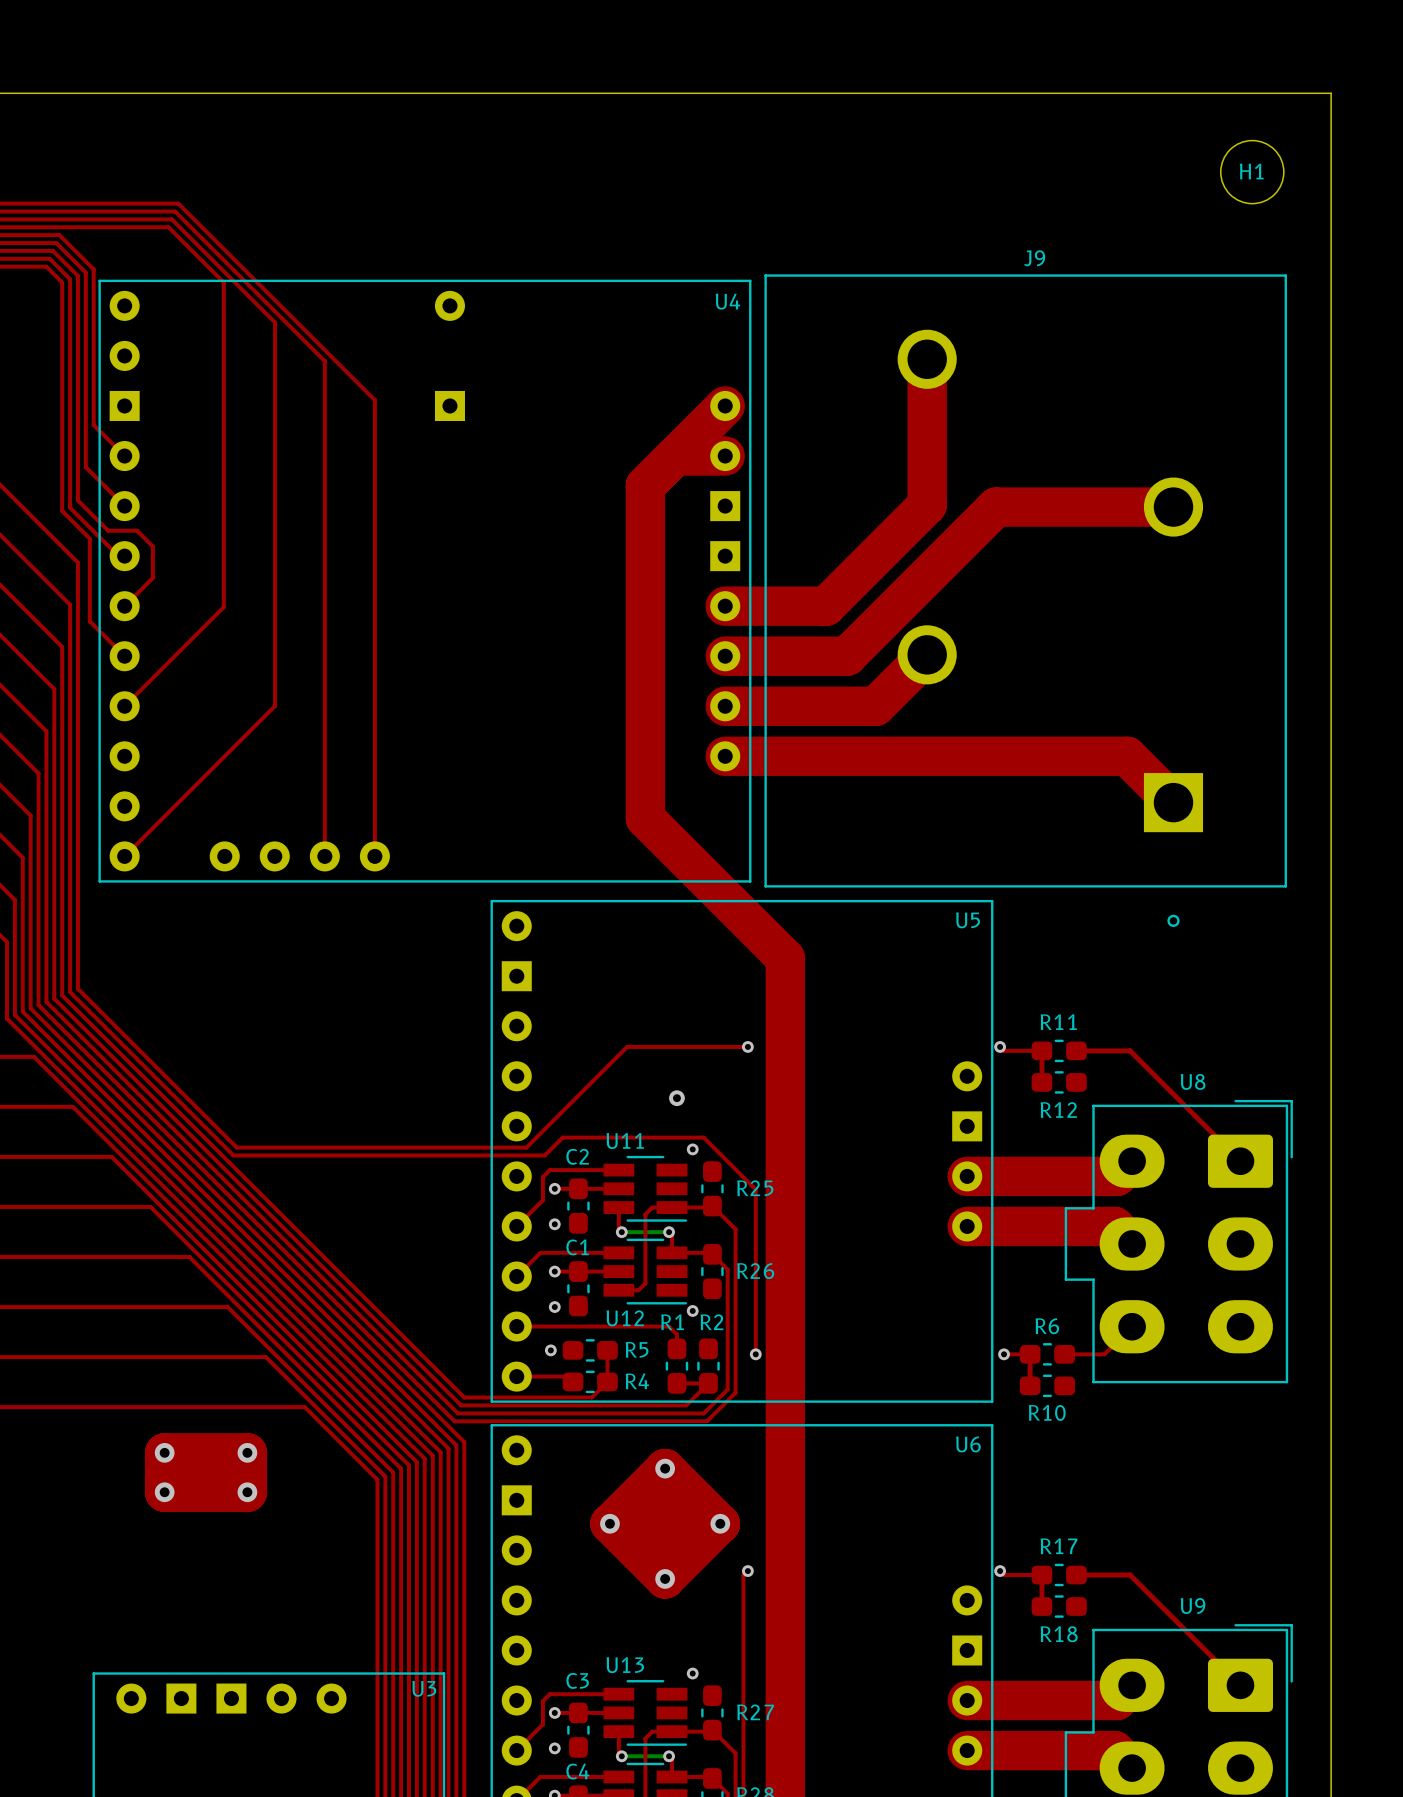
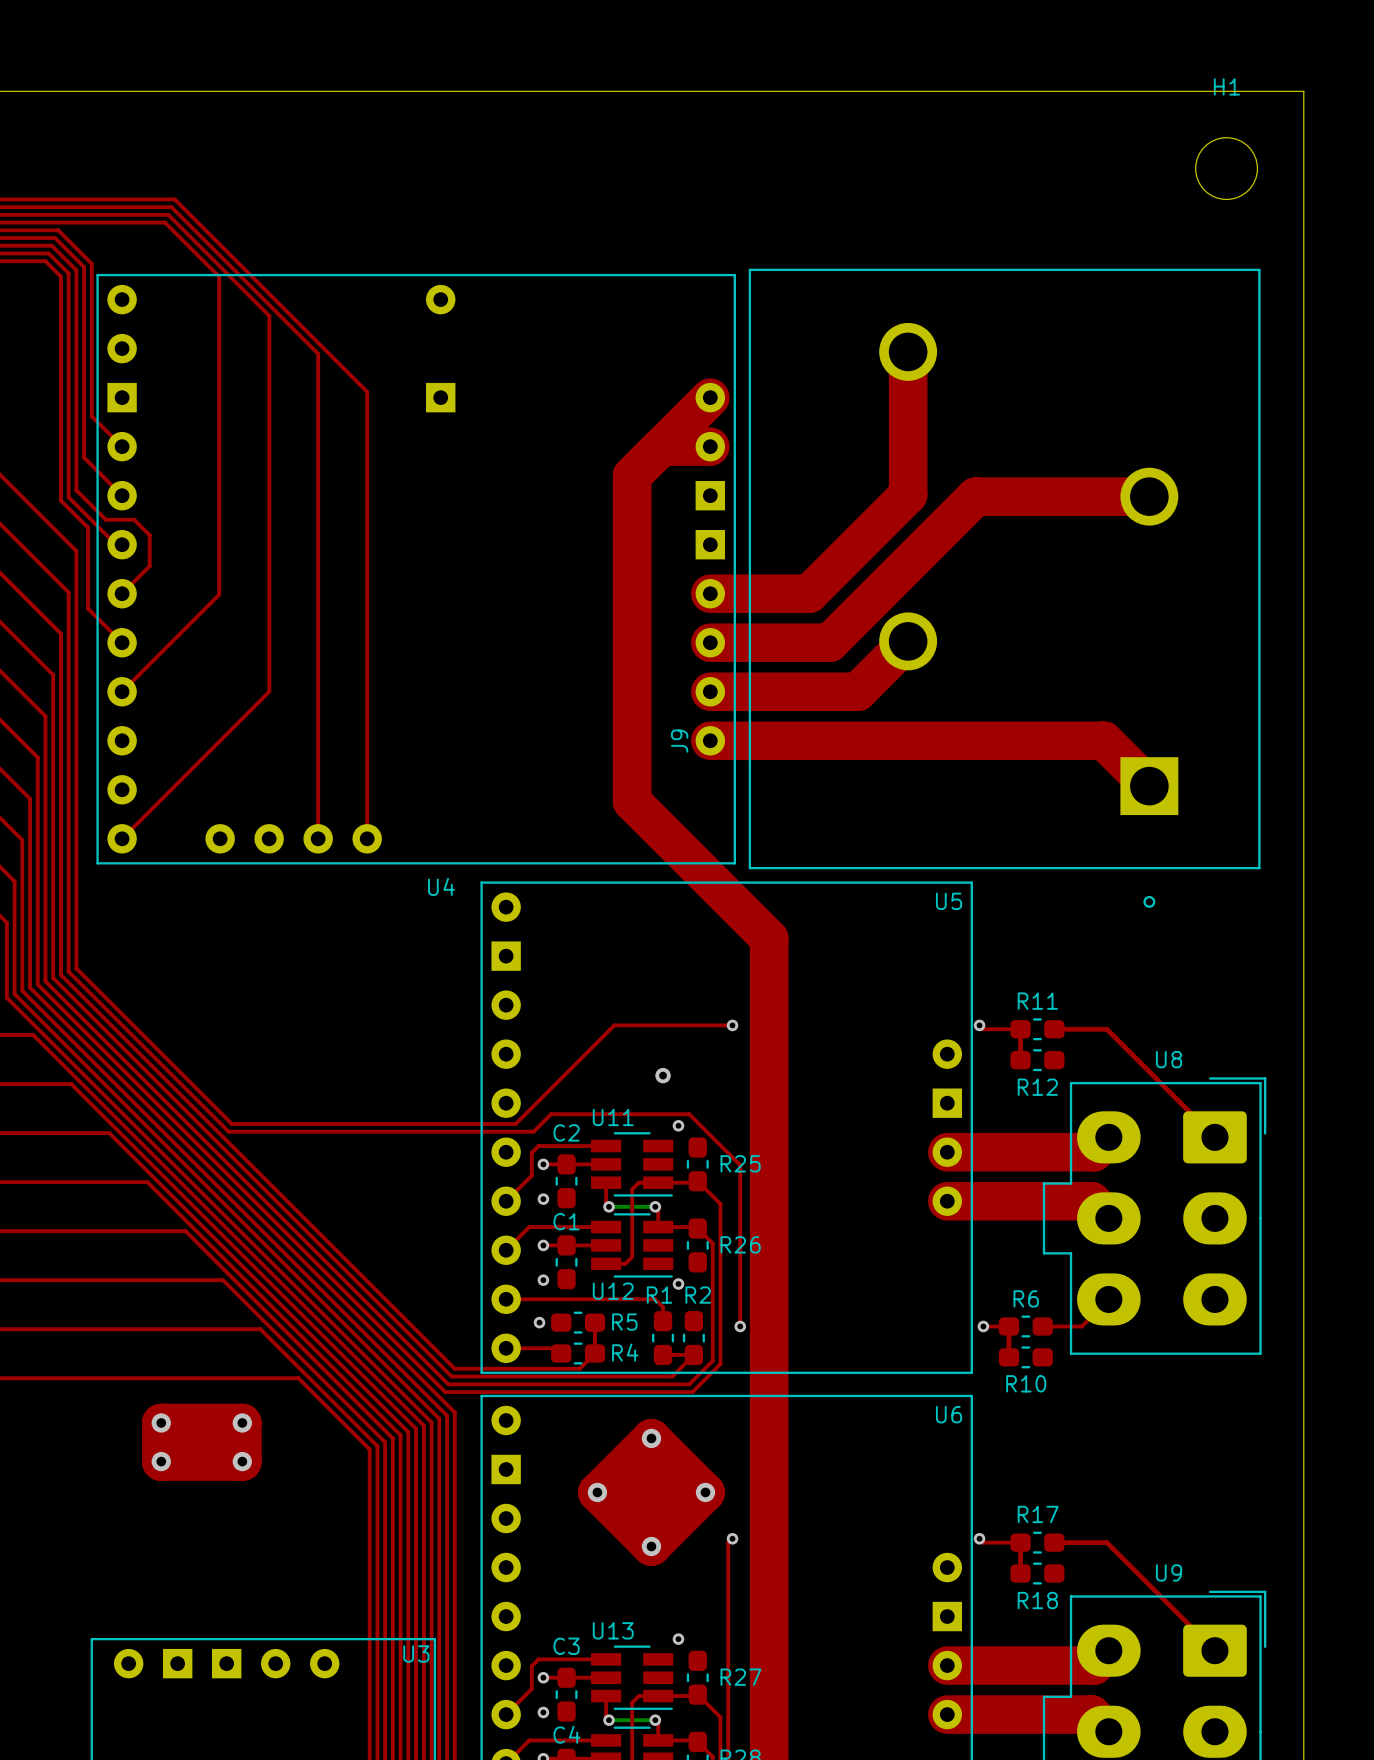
H1 name position: H1 (1251, 171) -> H1 (1226, 86)
J9 name rotation: 0° (1034, 258) -> 90° counterclockwise (679, 741)
J9 name position: J9 (1034, 258) -> J9 (679, 741)
U4 name position: U4 (727, 301) -> U4 (441, 886)

